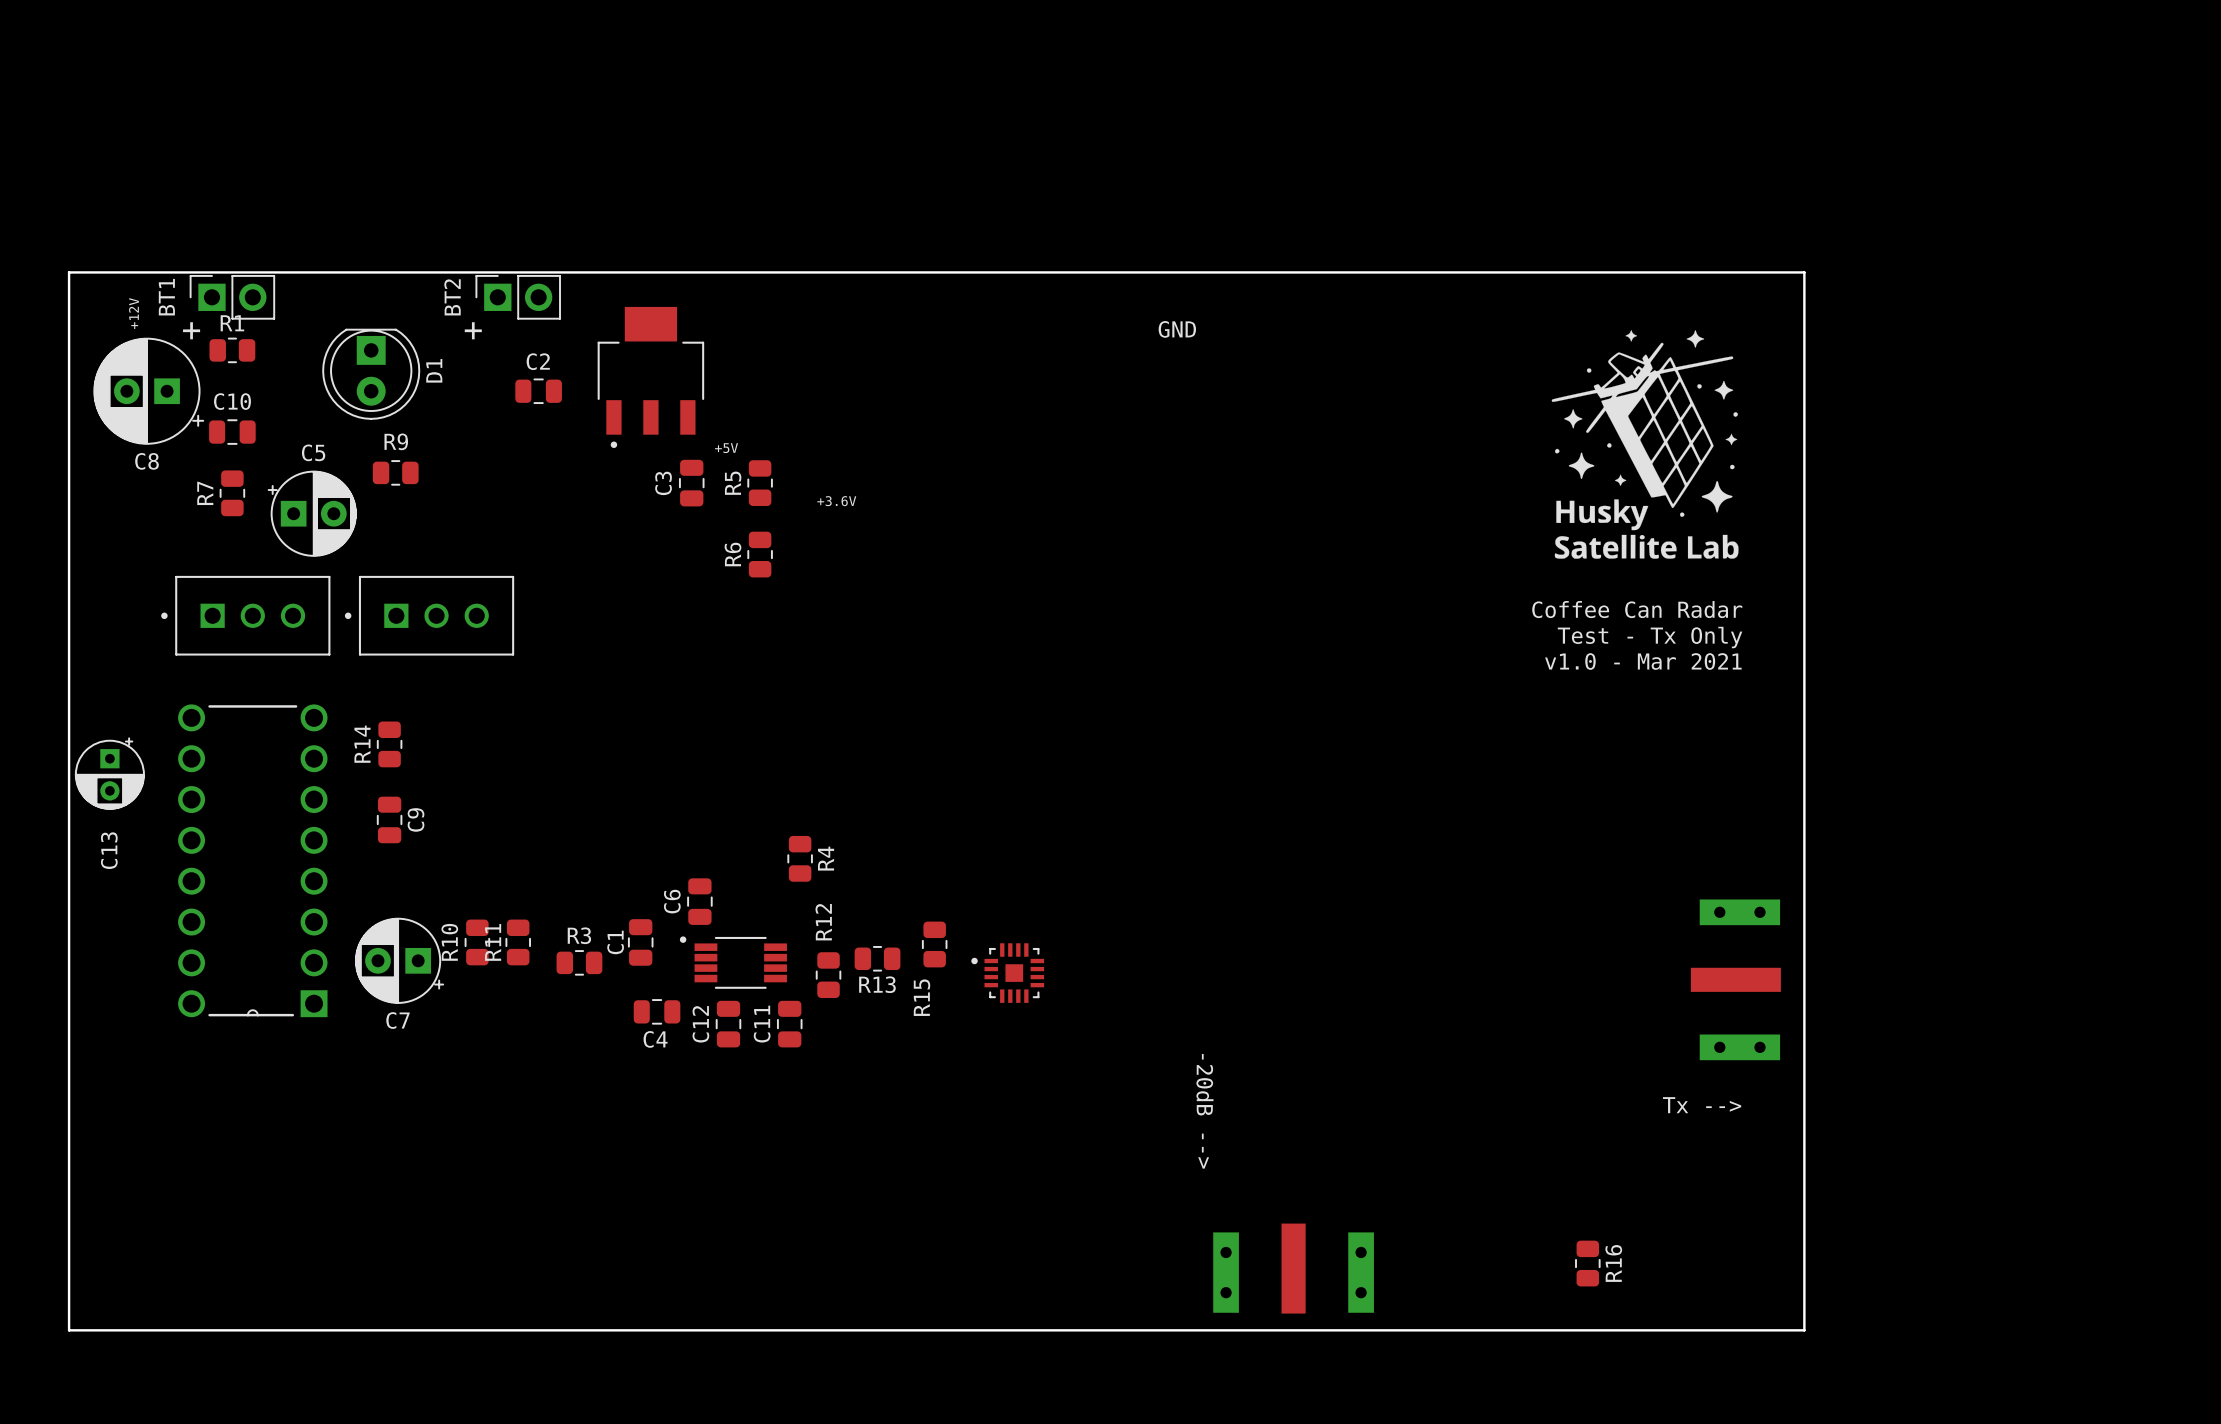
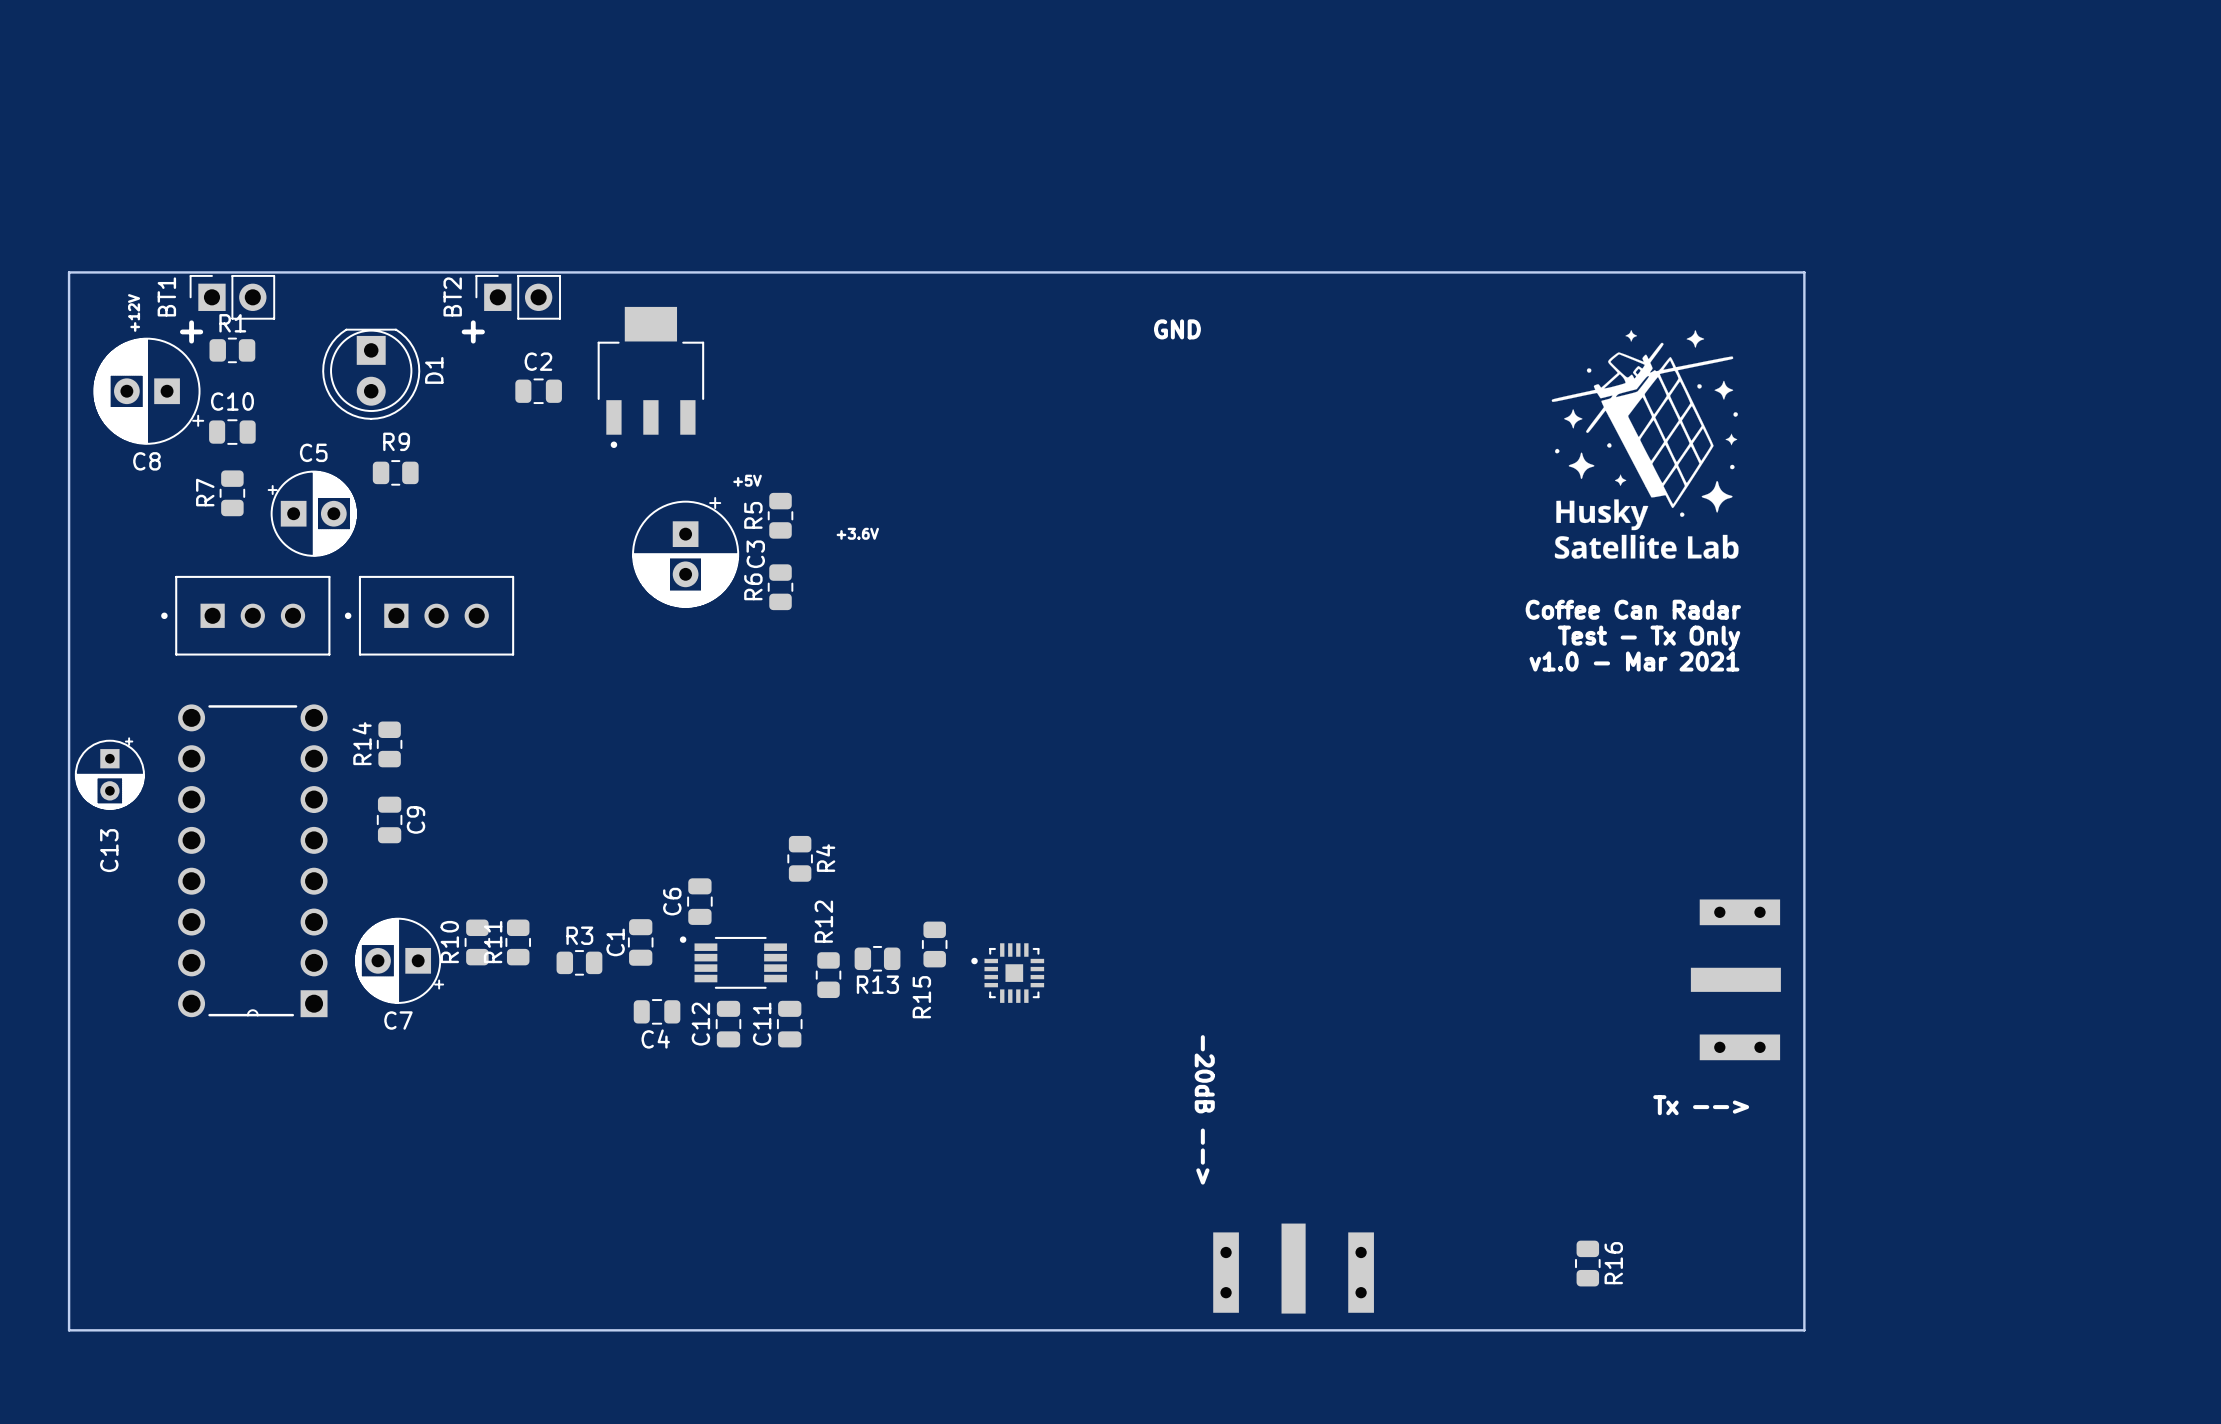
text position: +5V (726, 448) -> +5V (747, 480)
C3 footprint: [678, 459, 705, 507] -> [632, 497, 740, 608]
C3 name position: C3 (663, 483) -> C3 (755, 554)
R5 position: (760, 483) -> (780, 515)
text position: +3.6V (836, 501) -> +3.6V (857, 533)
R6 position: (760, 554) -> (780, 587)

